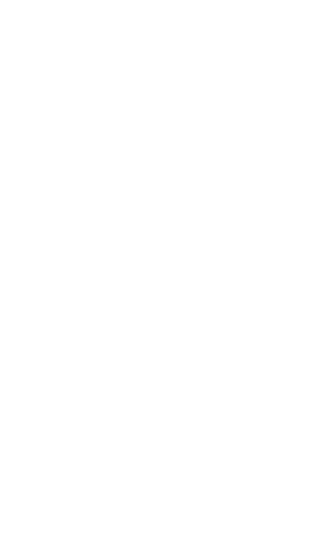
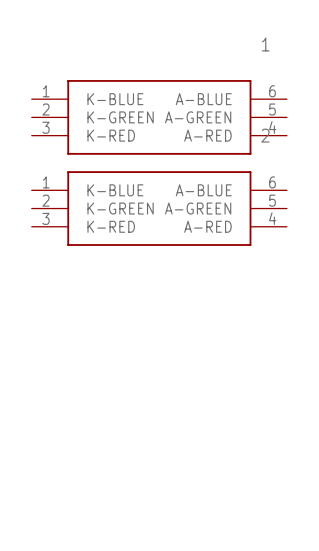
1: none -> (159, 117)
2: none -> (159, 208)

